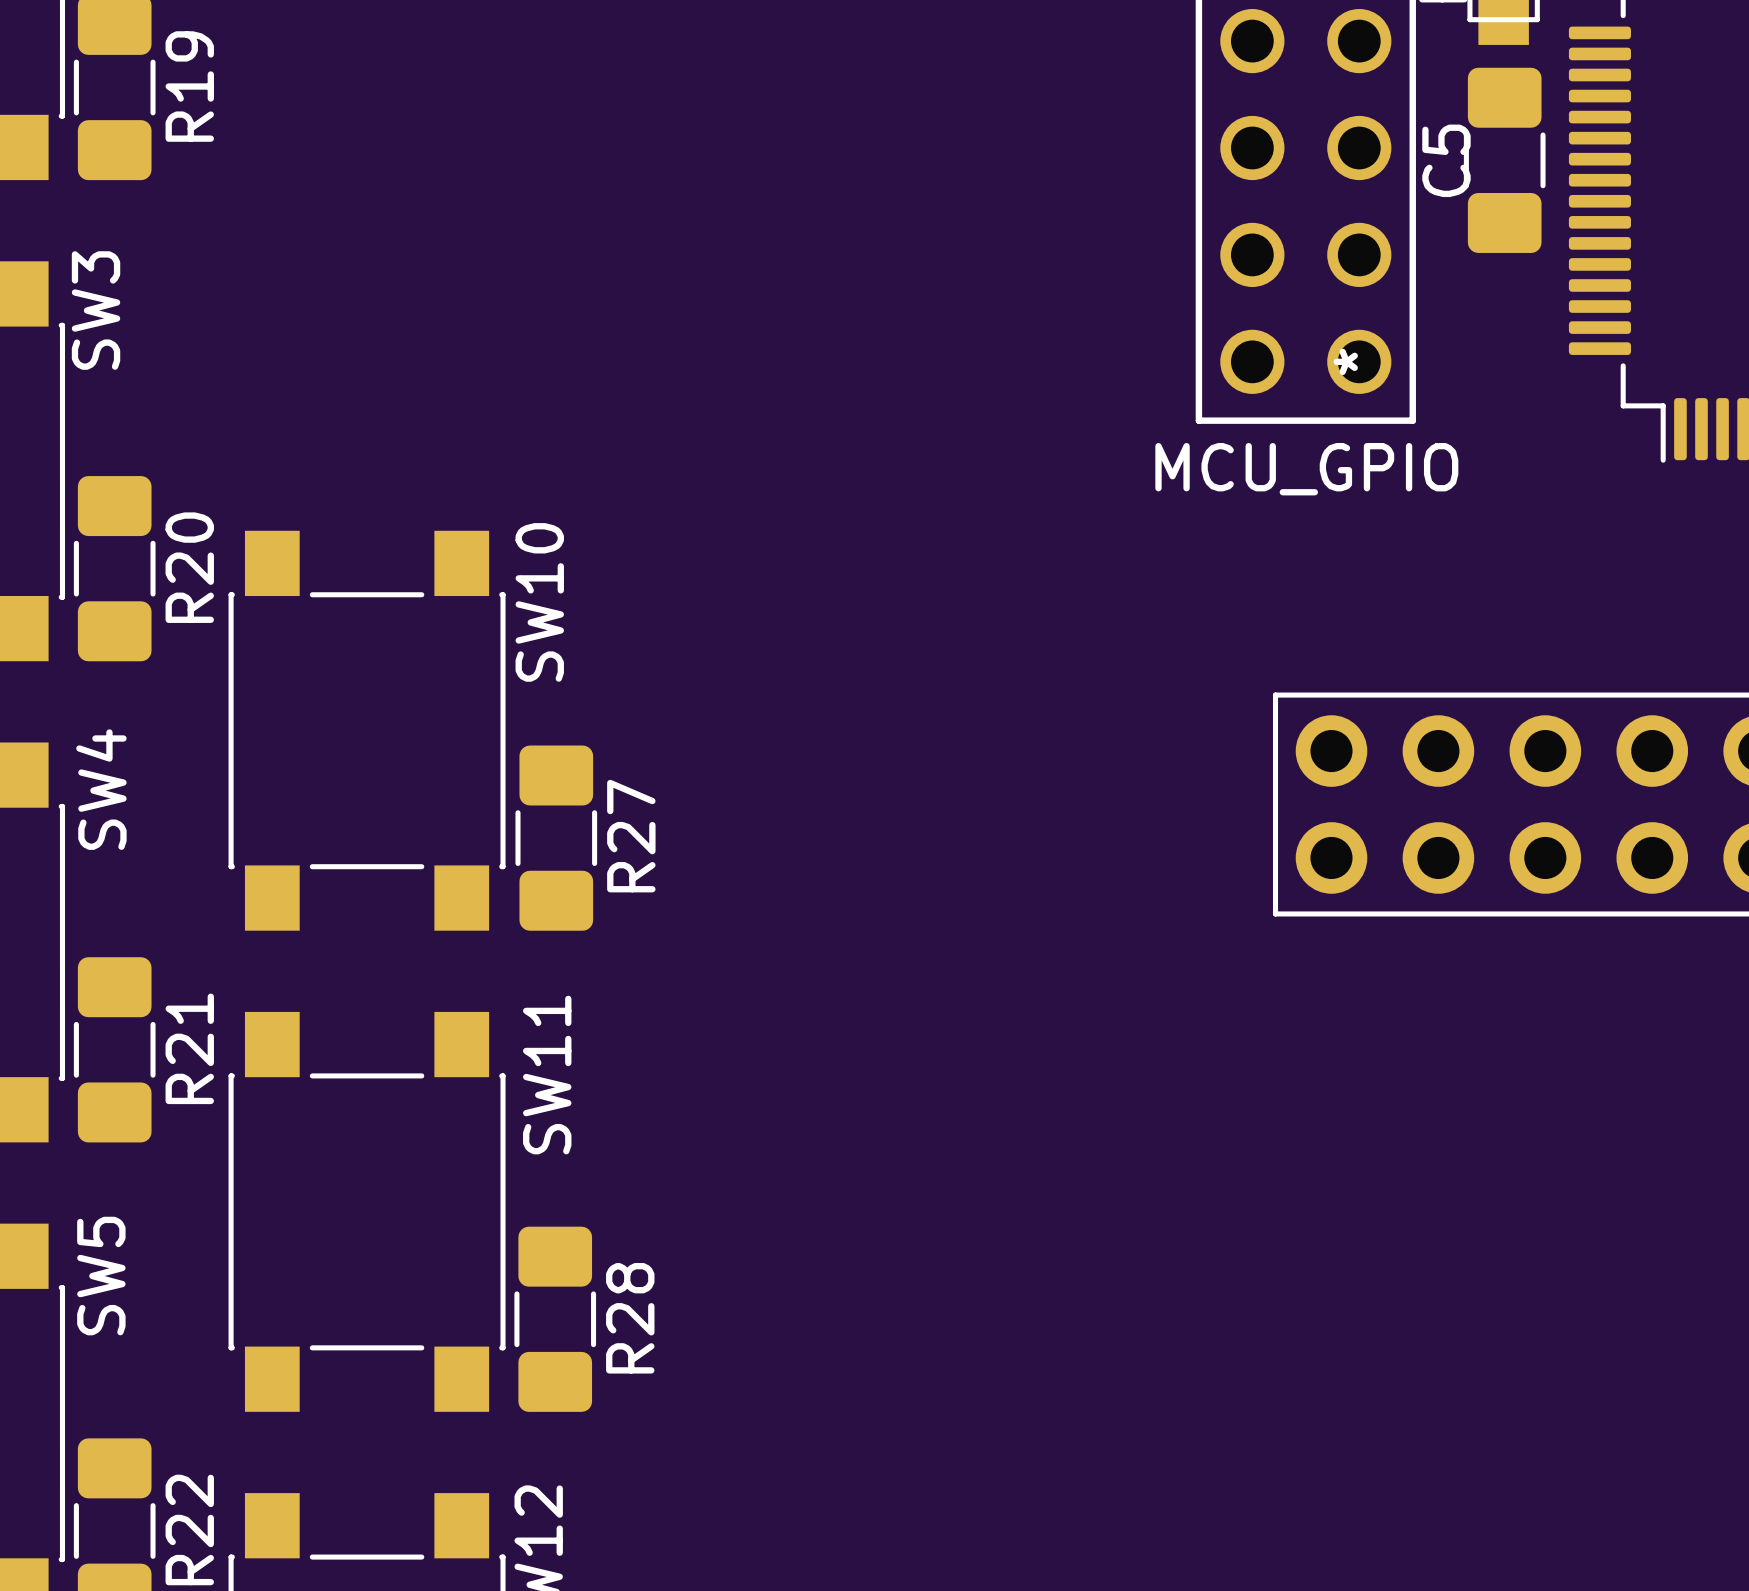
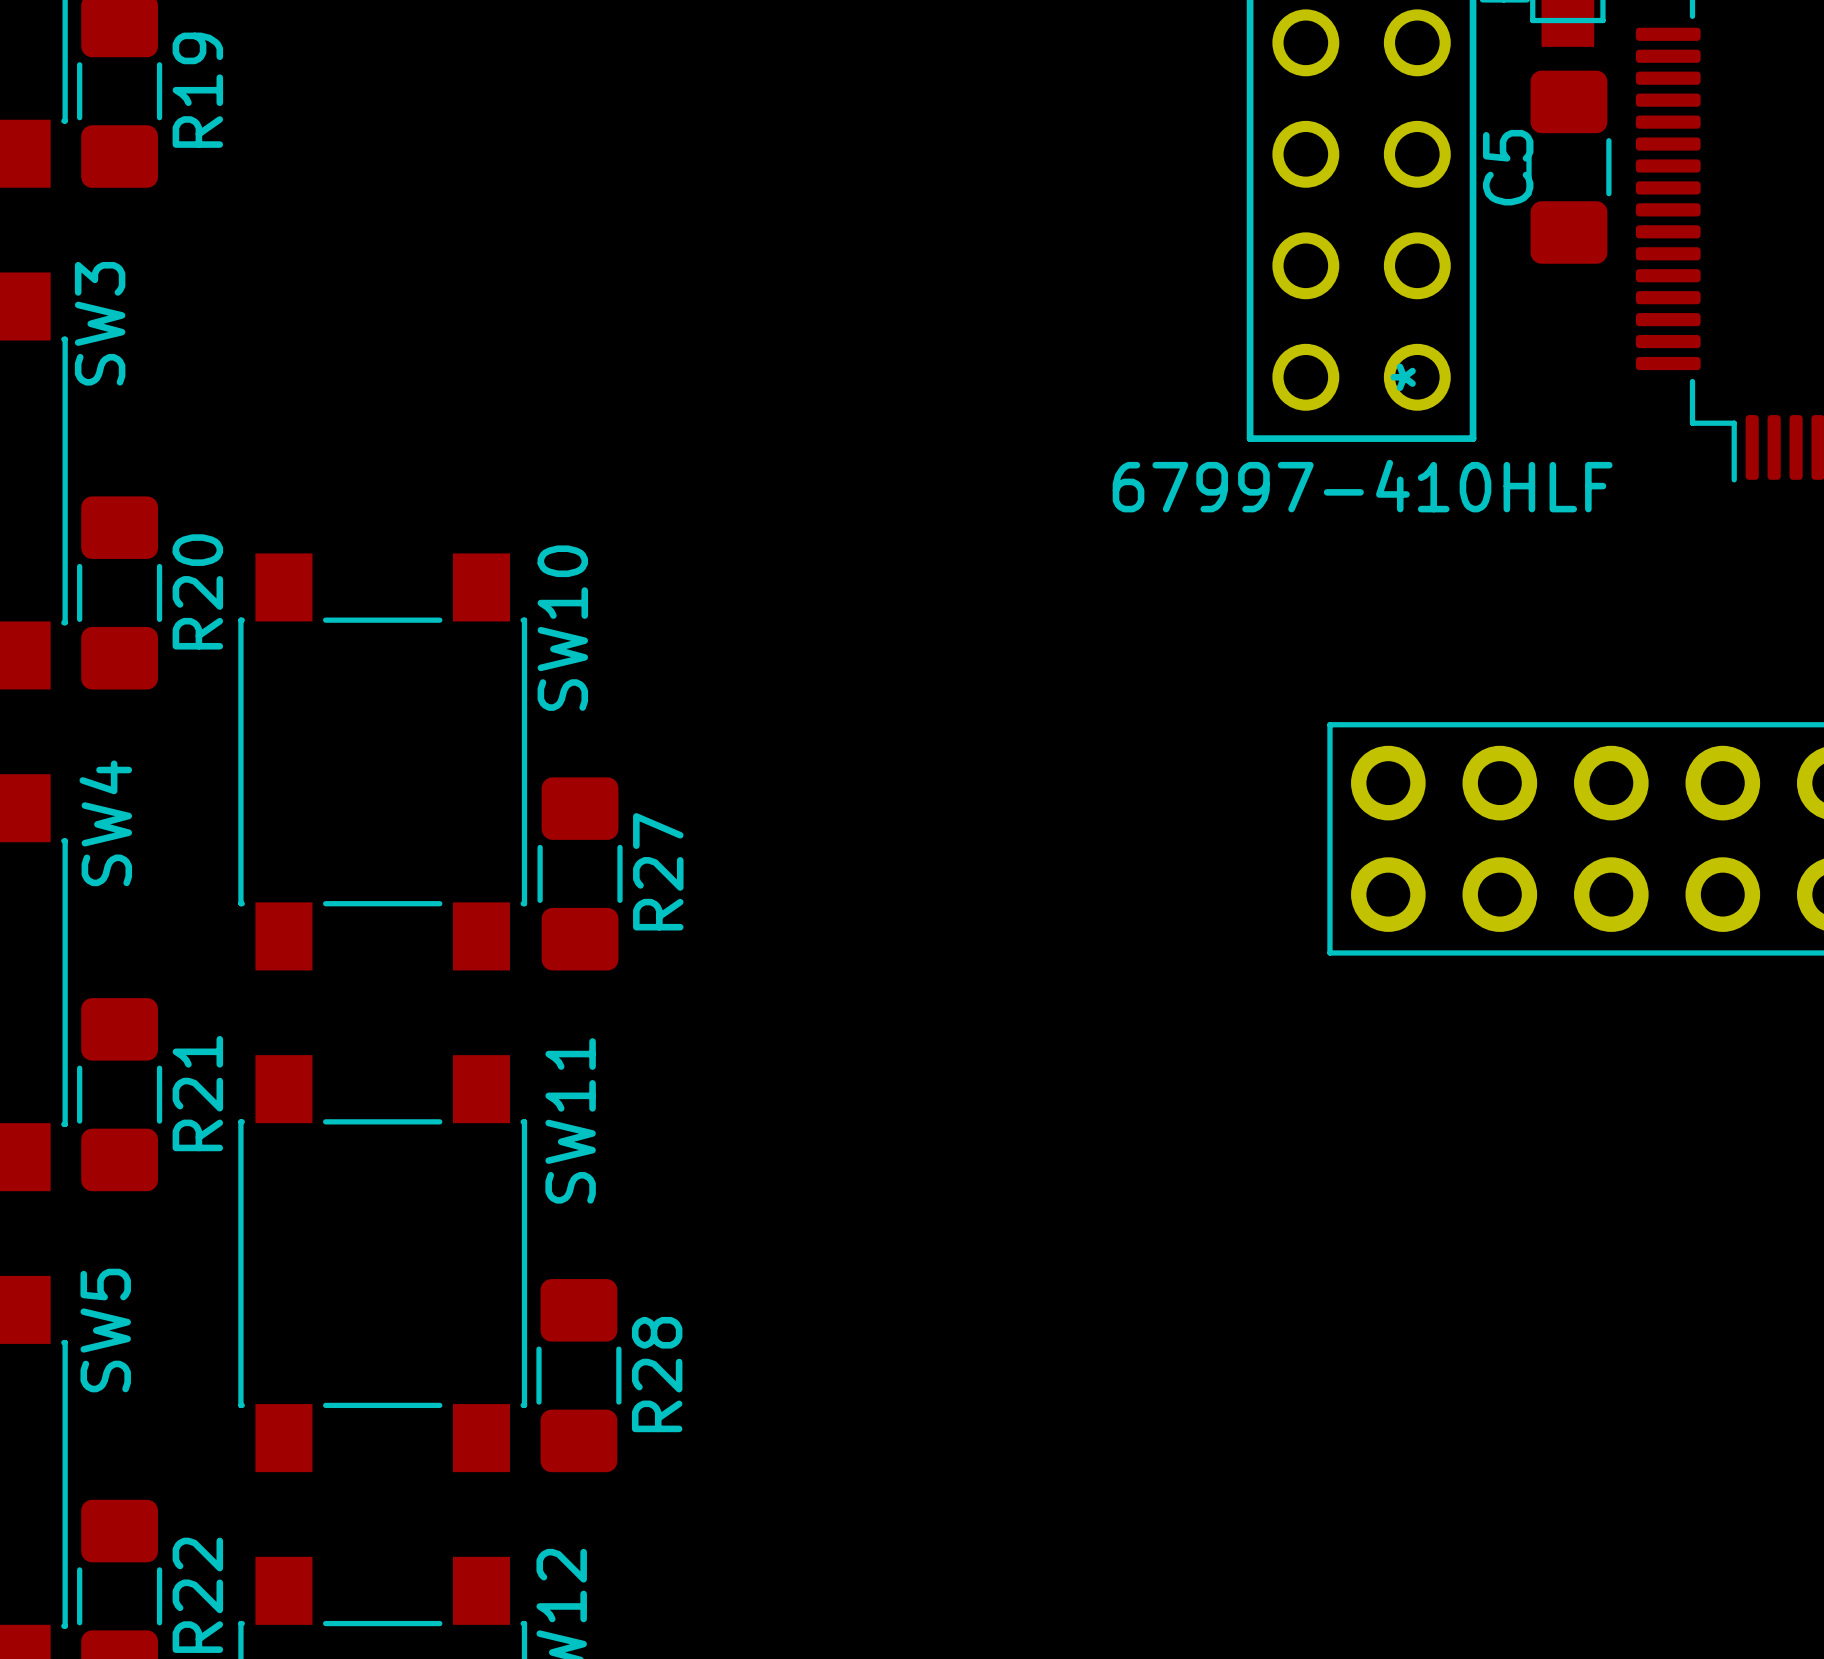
part value: MCU_GPIO (1306, 469) -> 67997-410HLF (1362, 486)

